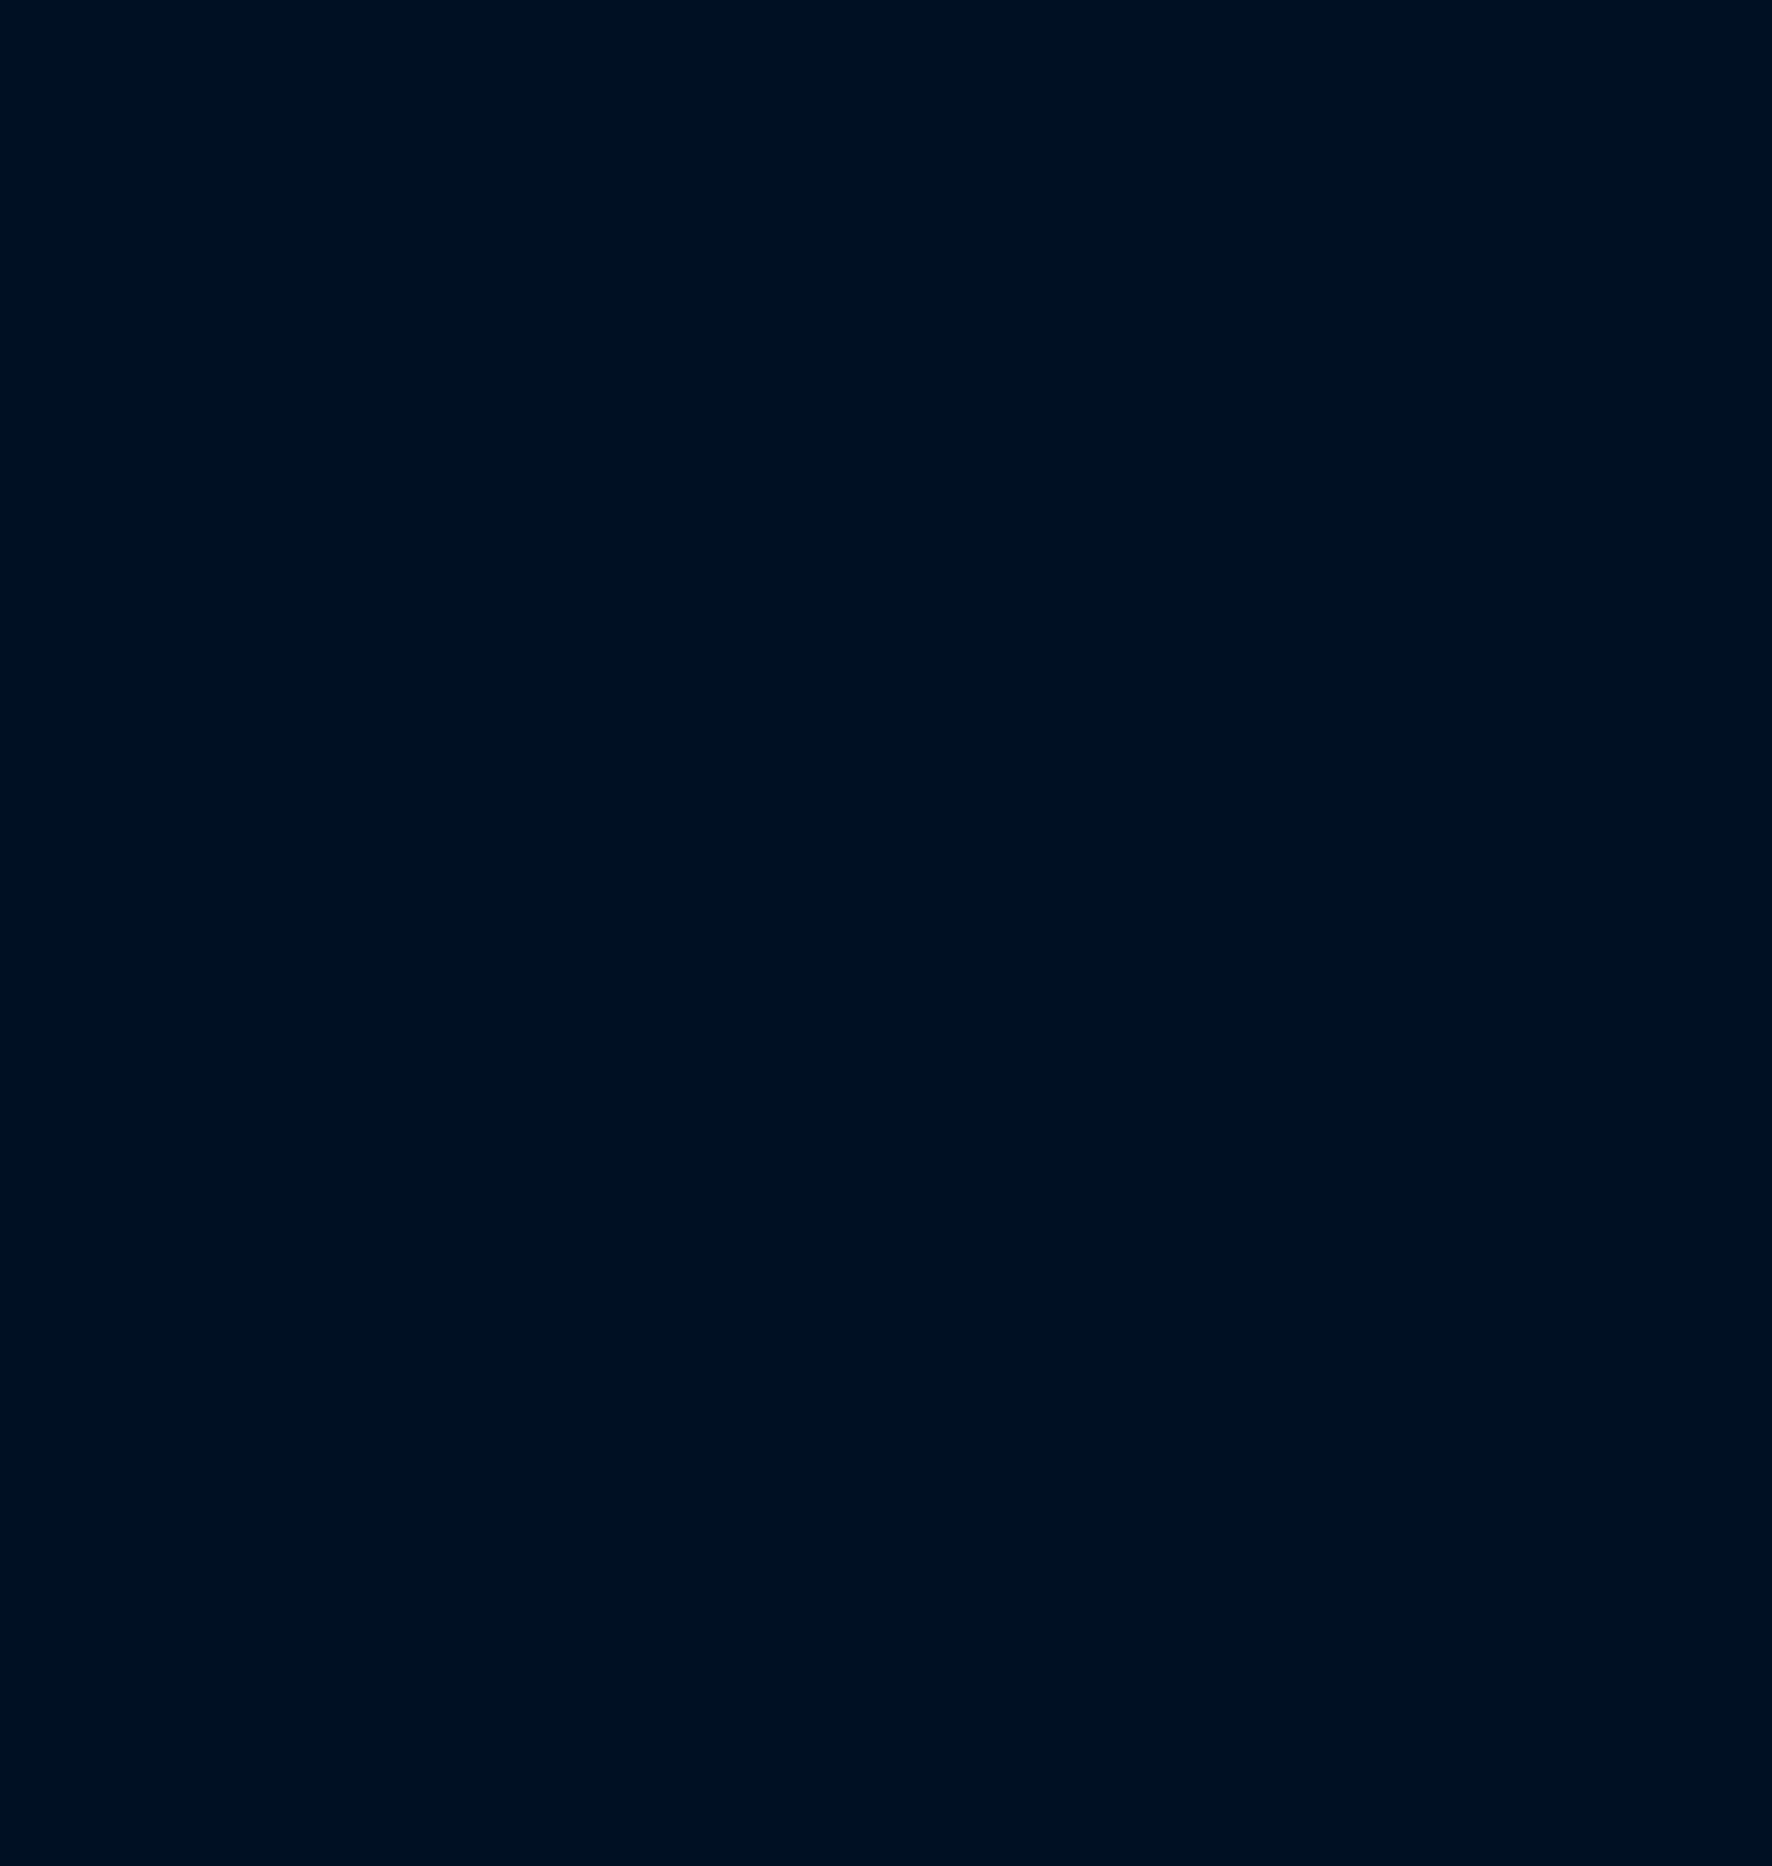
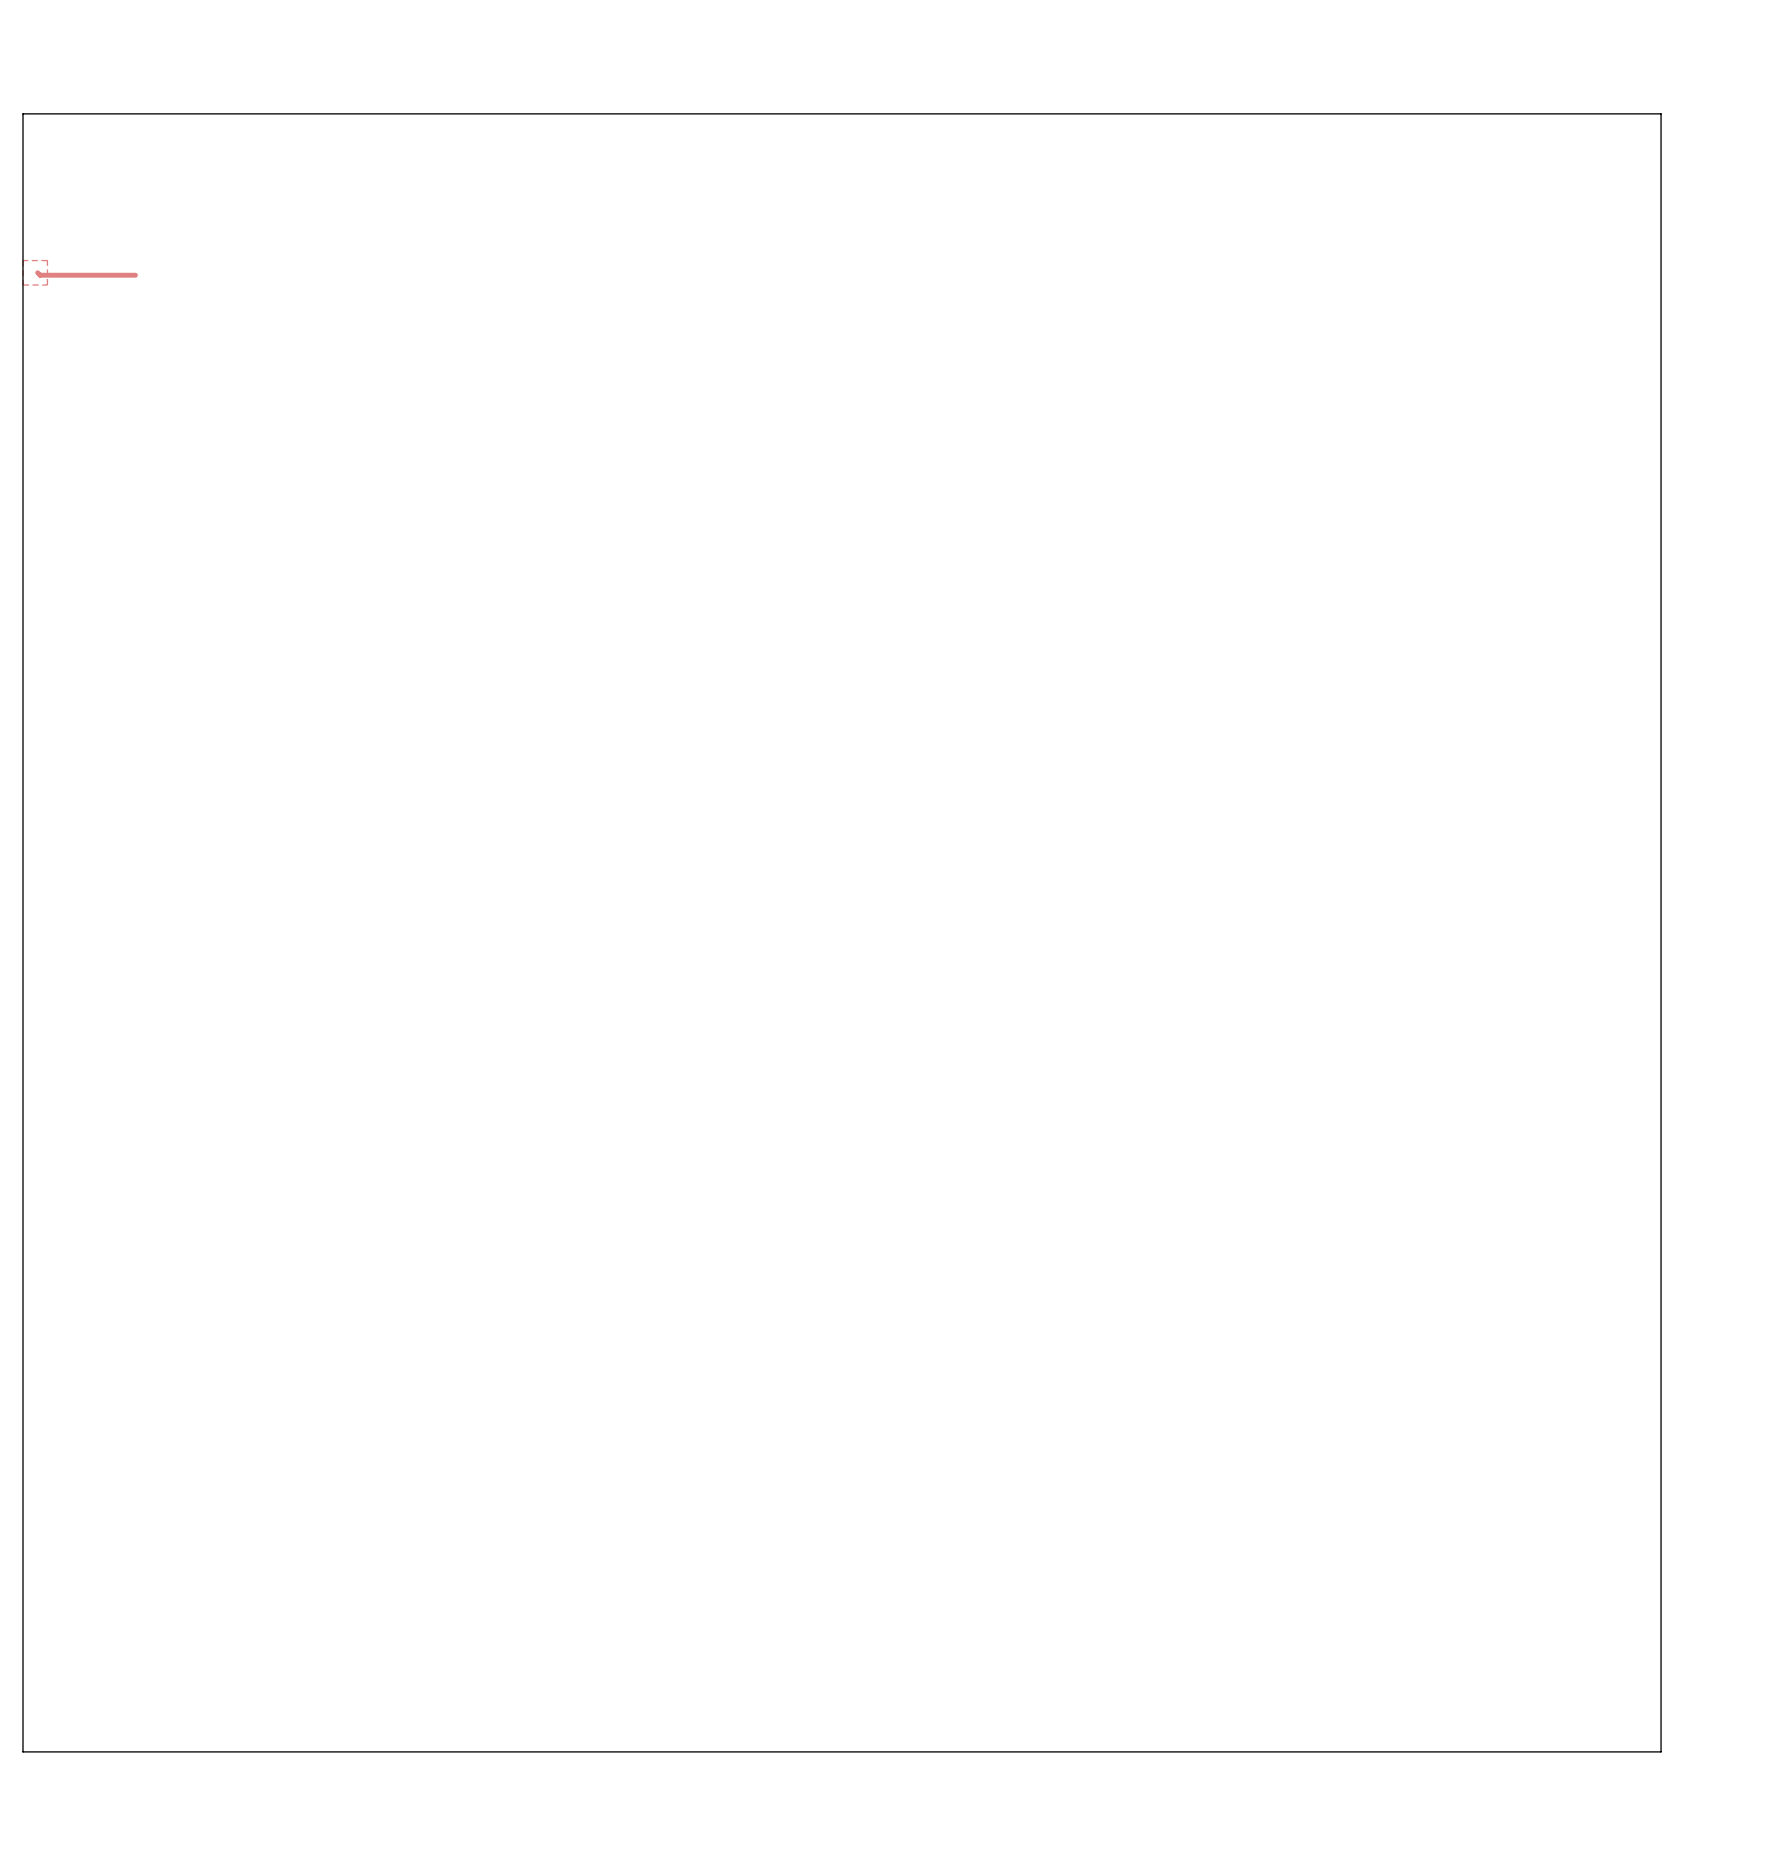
board edge: none -> (22, 113) (1661, 113) (1661, 1751) (22, 1751) (22, 113)
top zone outline: none -> (22, 260) (47, 260) (47, 285) (22, 285) (22, 260)
top track: none -> (37, 272) (40, 275) (135, 275)

